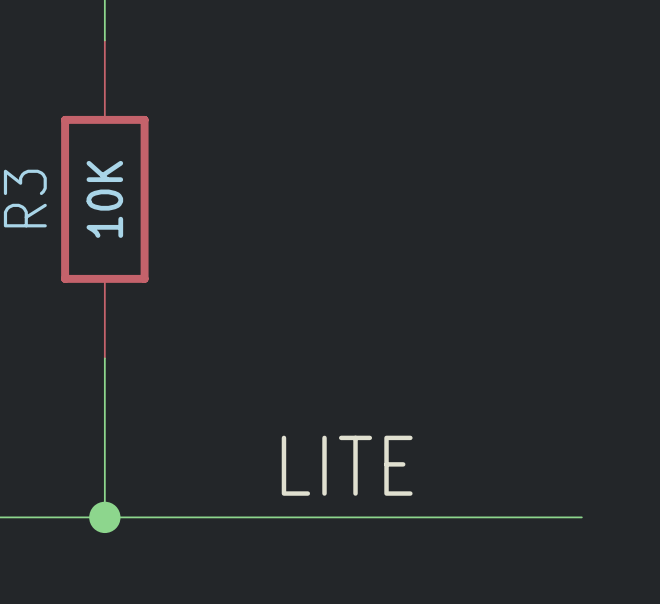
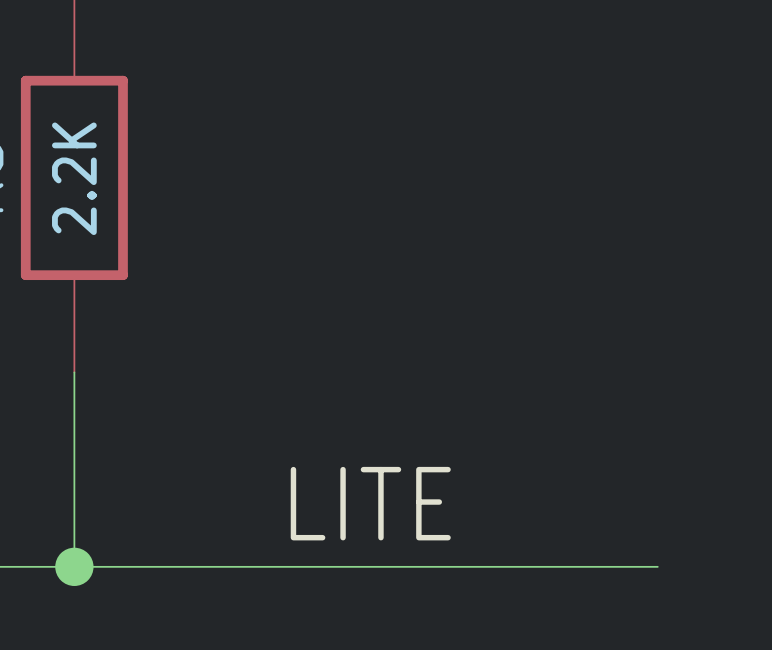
R3 value: 10K (104, 199) -> 2.2K (74, 178)

